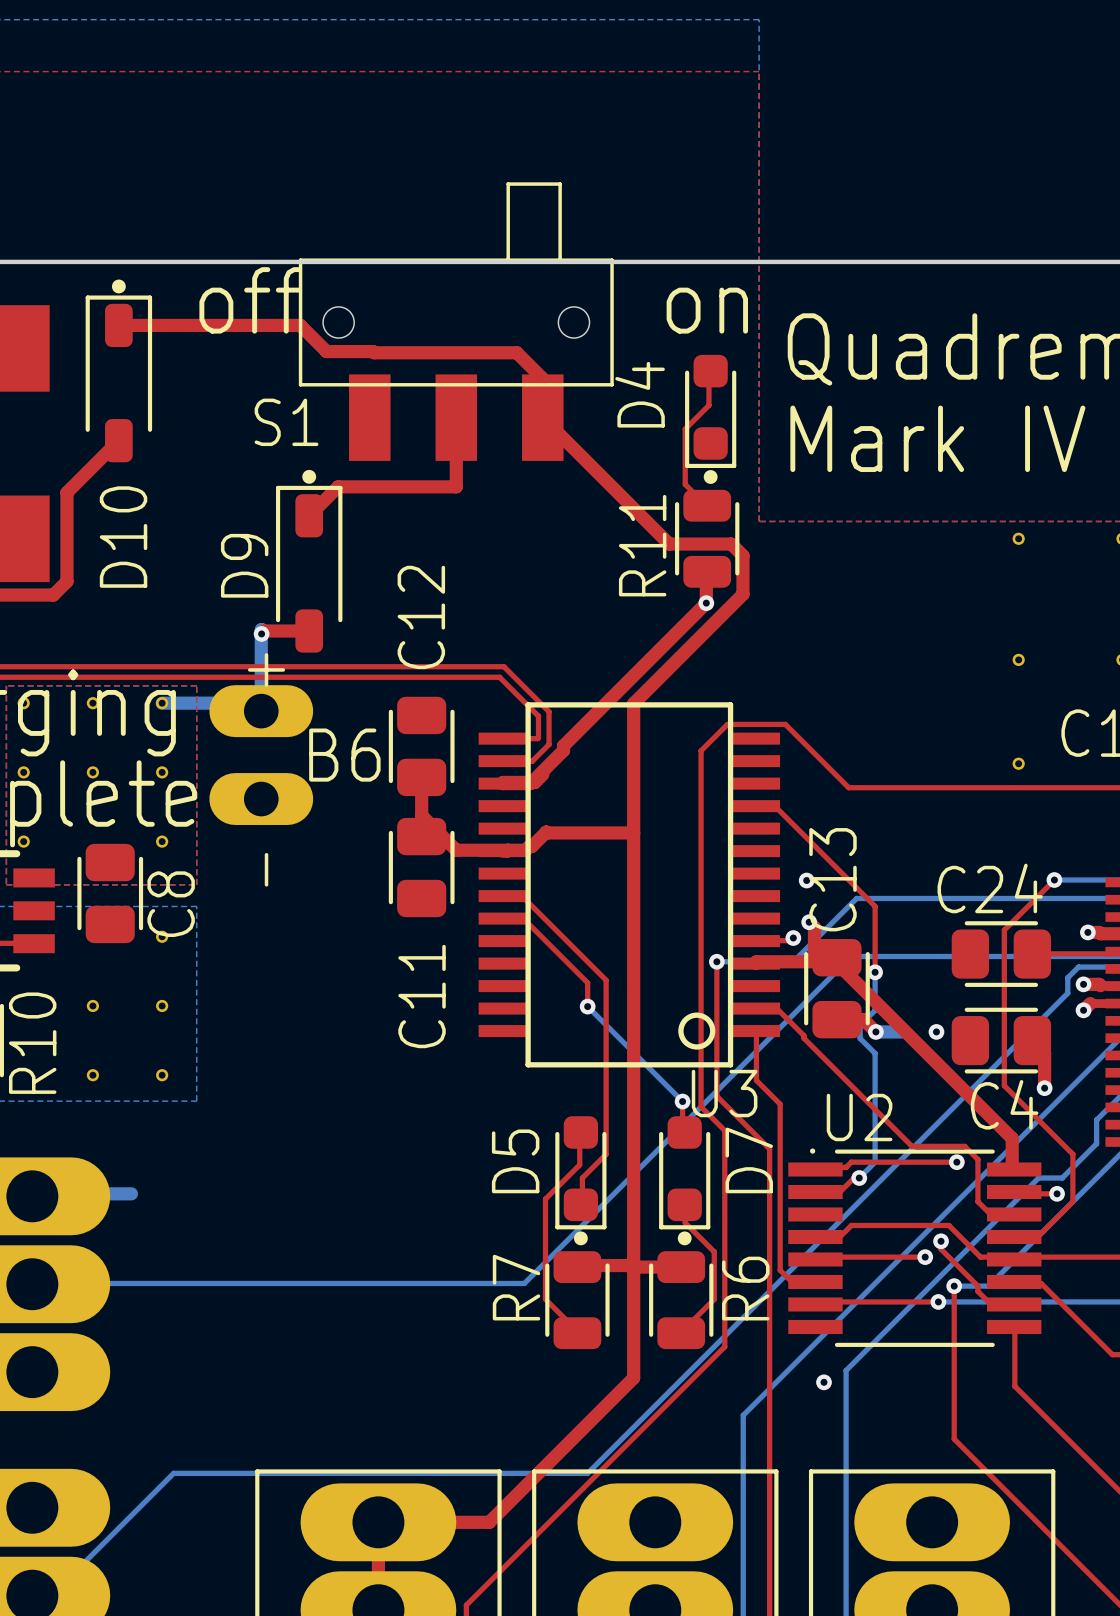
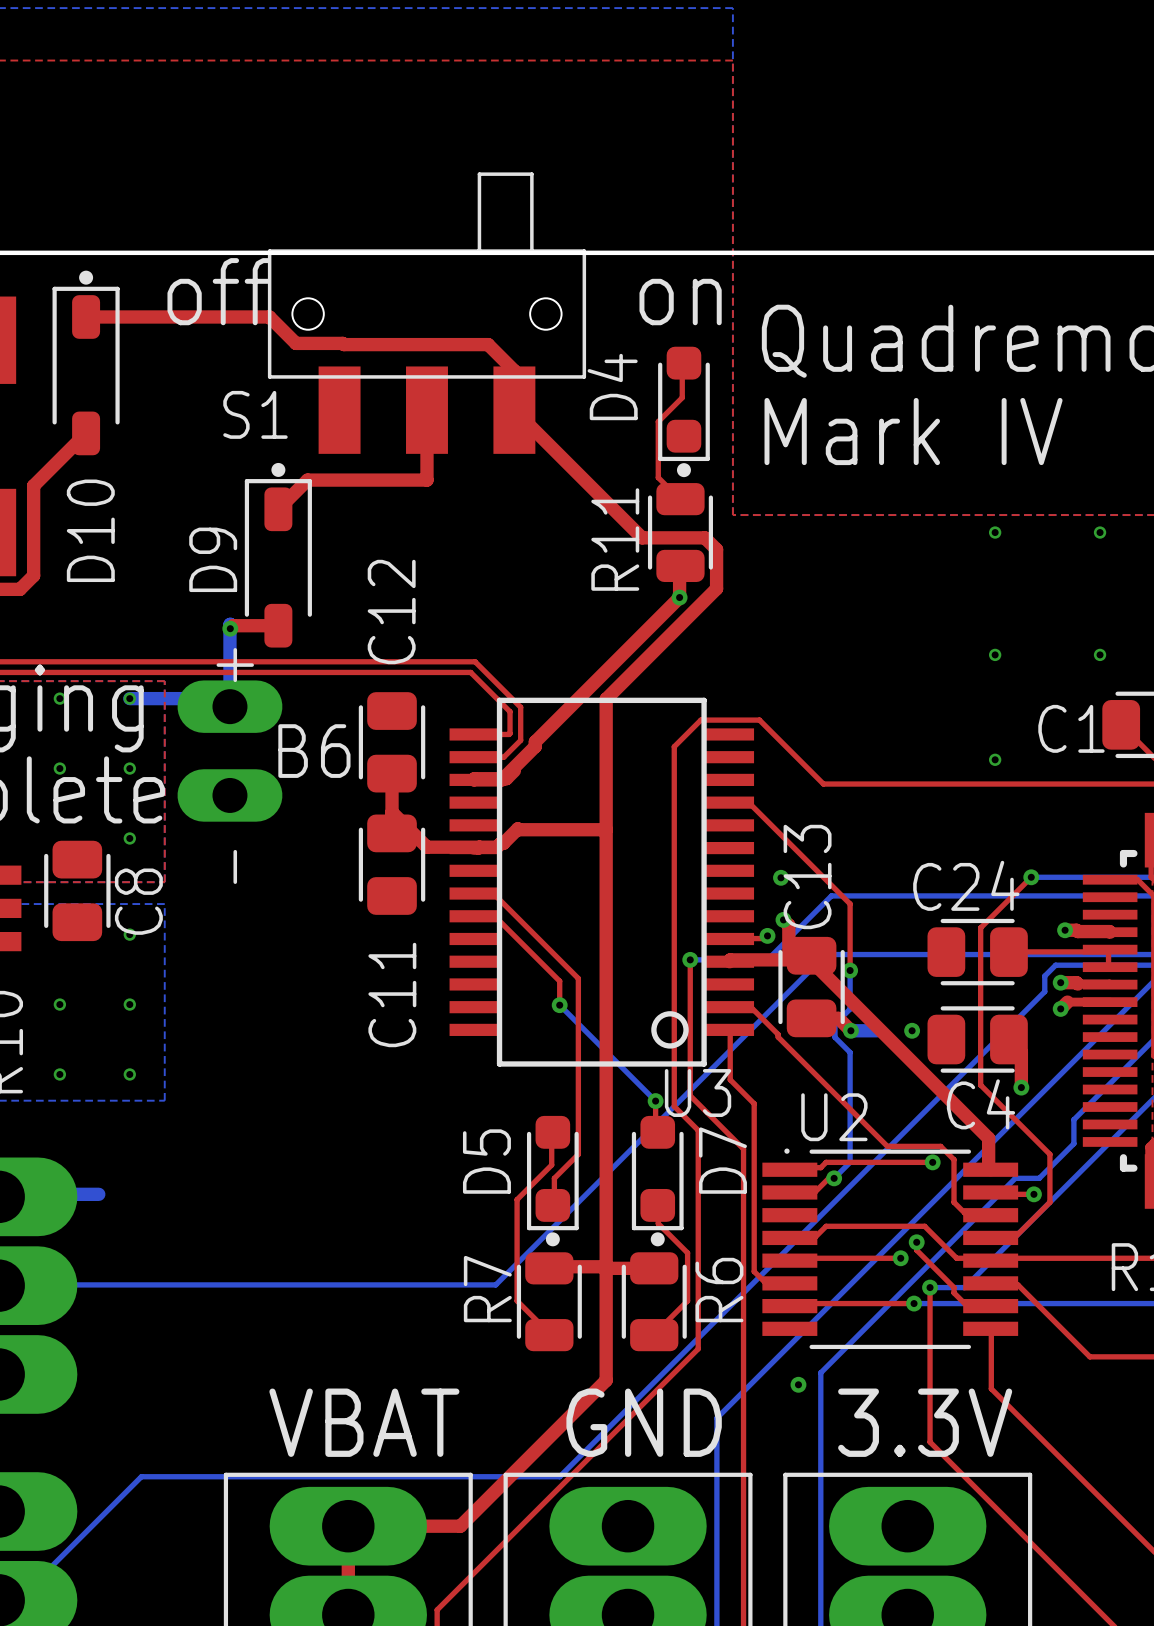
VBAT name: none -> VBAT (364, 1422)
GND name: none -> GND (644, 1422)
3.3V name: none -> 3.3V (925, 1422)

